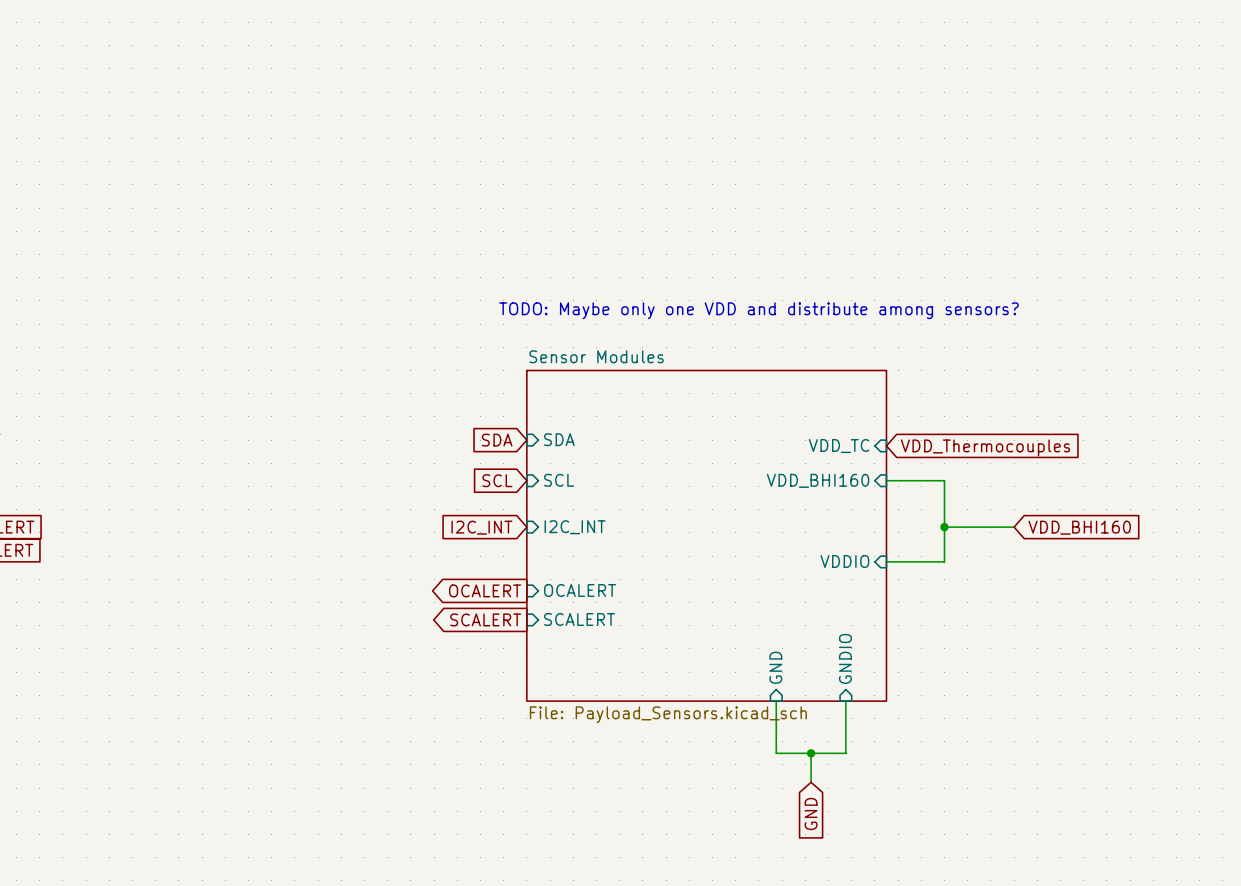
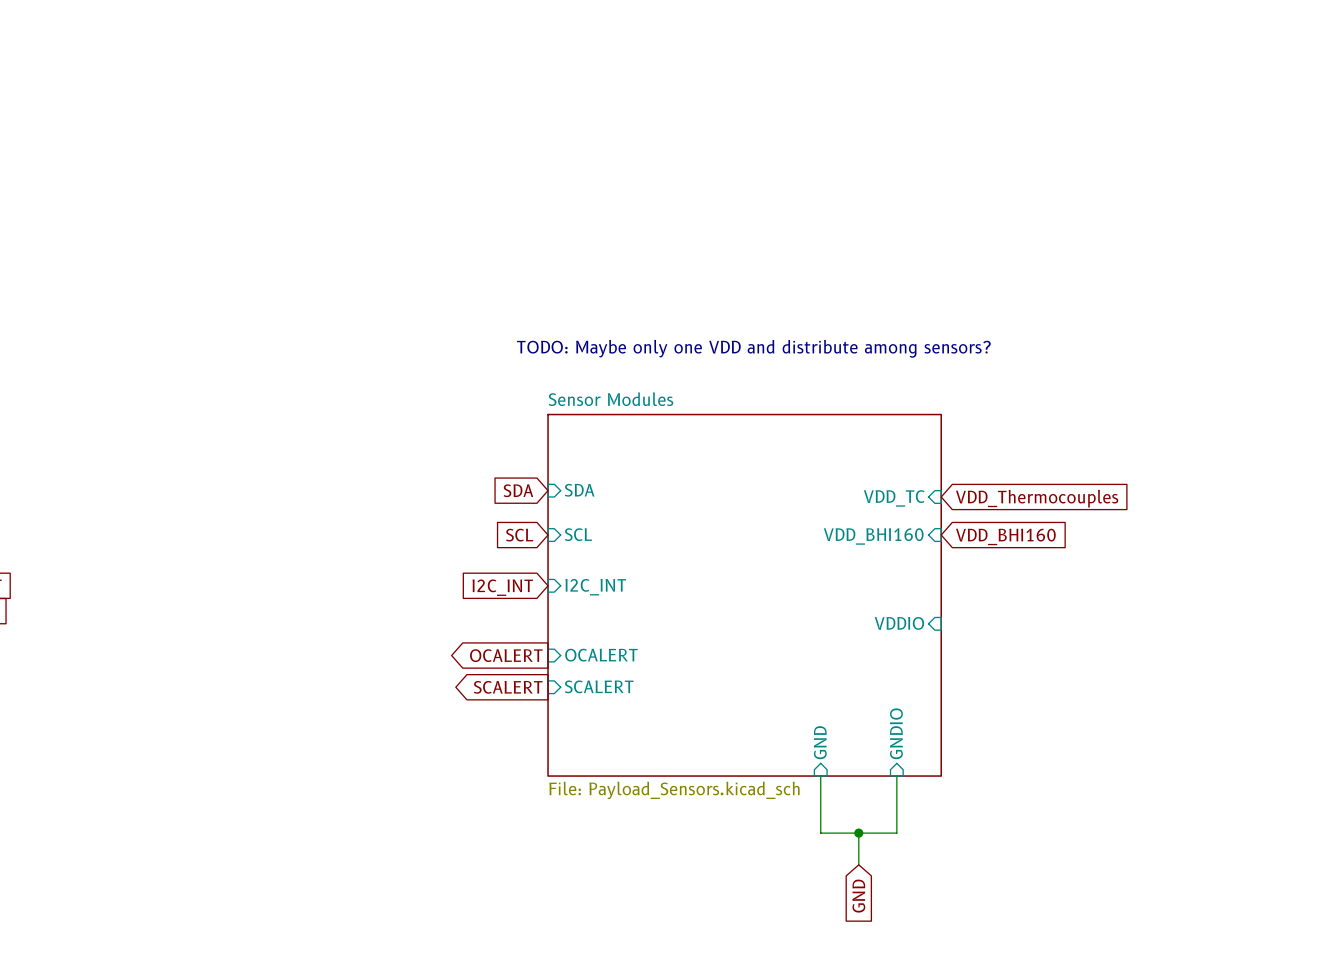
wire: (886, 480) (944, 480) (944, 561) (886, 561) -> none
wire: (944, 527) (1014, 527) -> none
junction: (944, 527) -> none
global label position: VDD_BHI160 (1079, 527) -> VDD_BHI160 (1005, 536)

